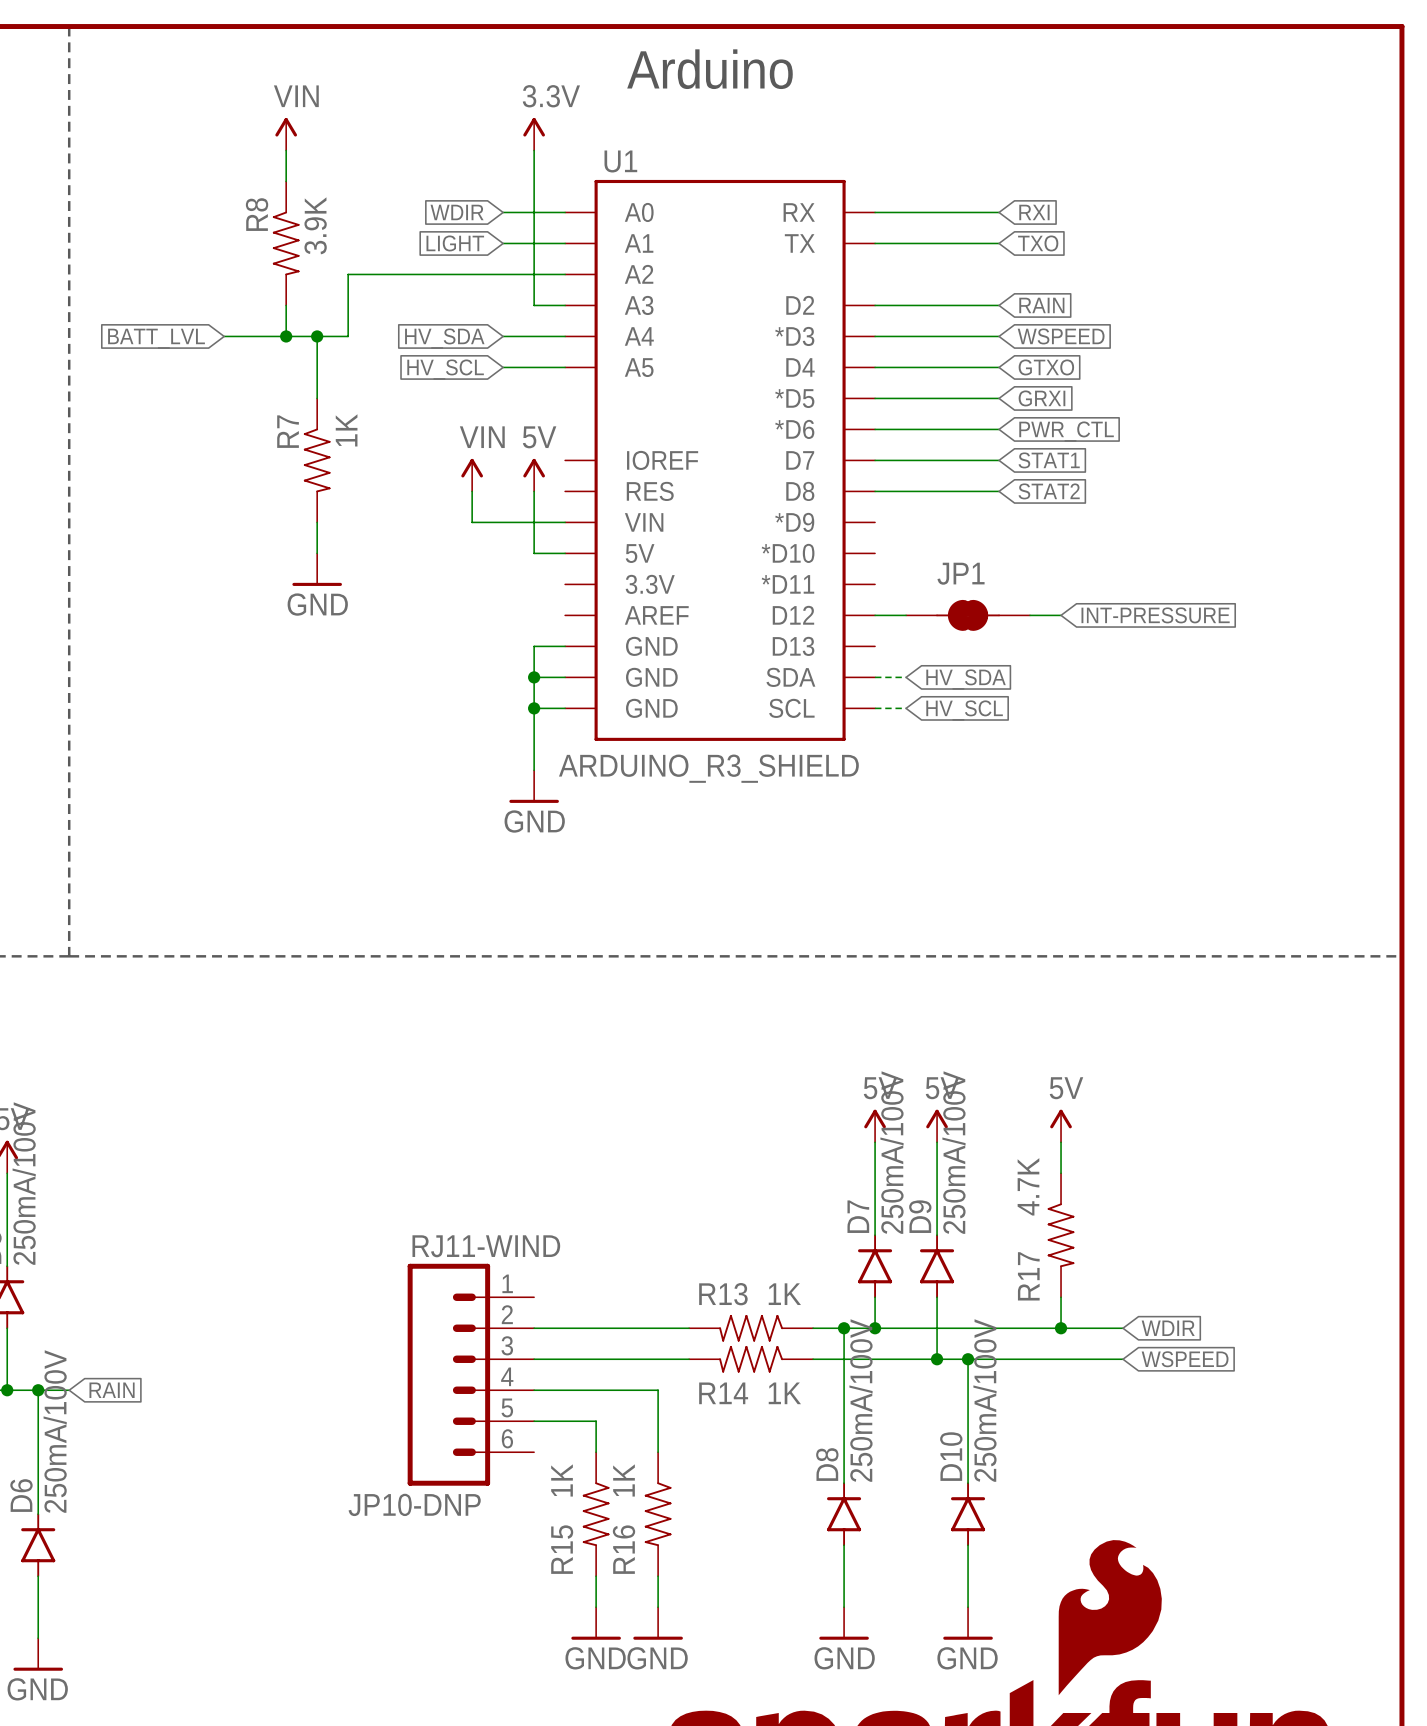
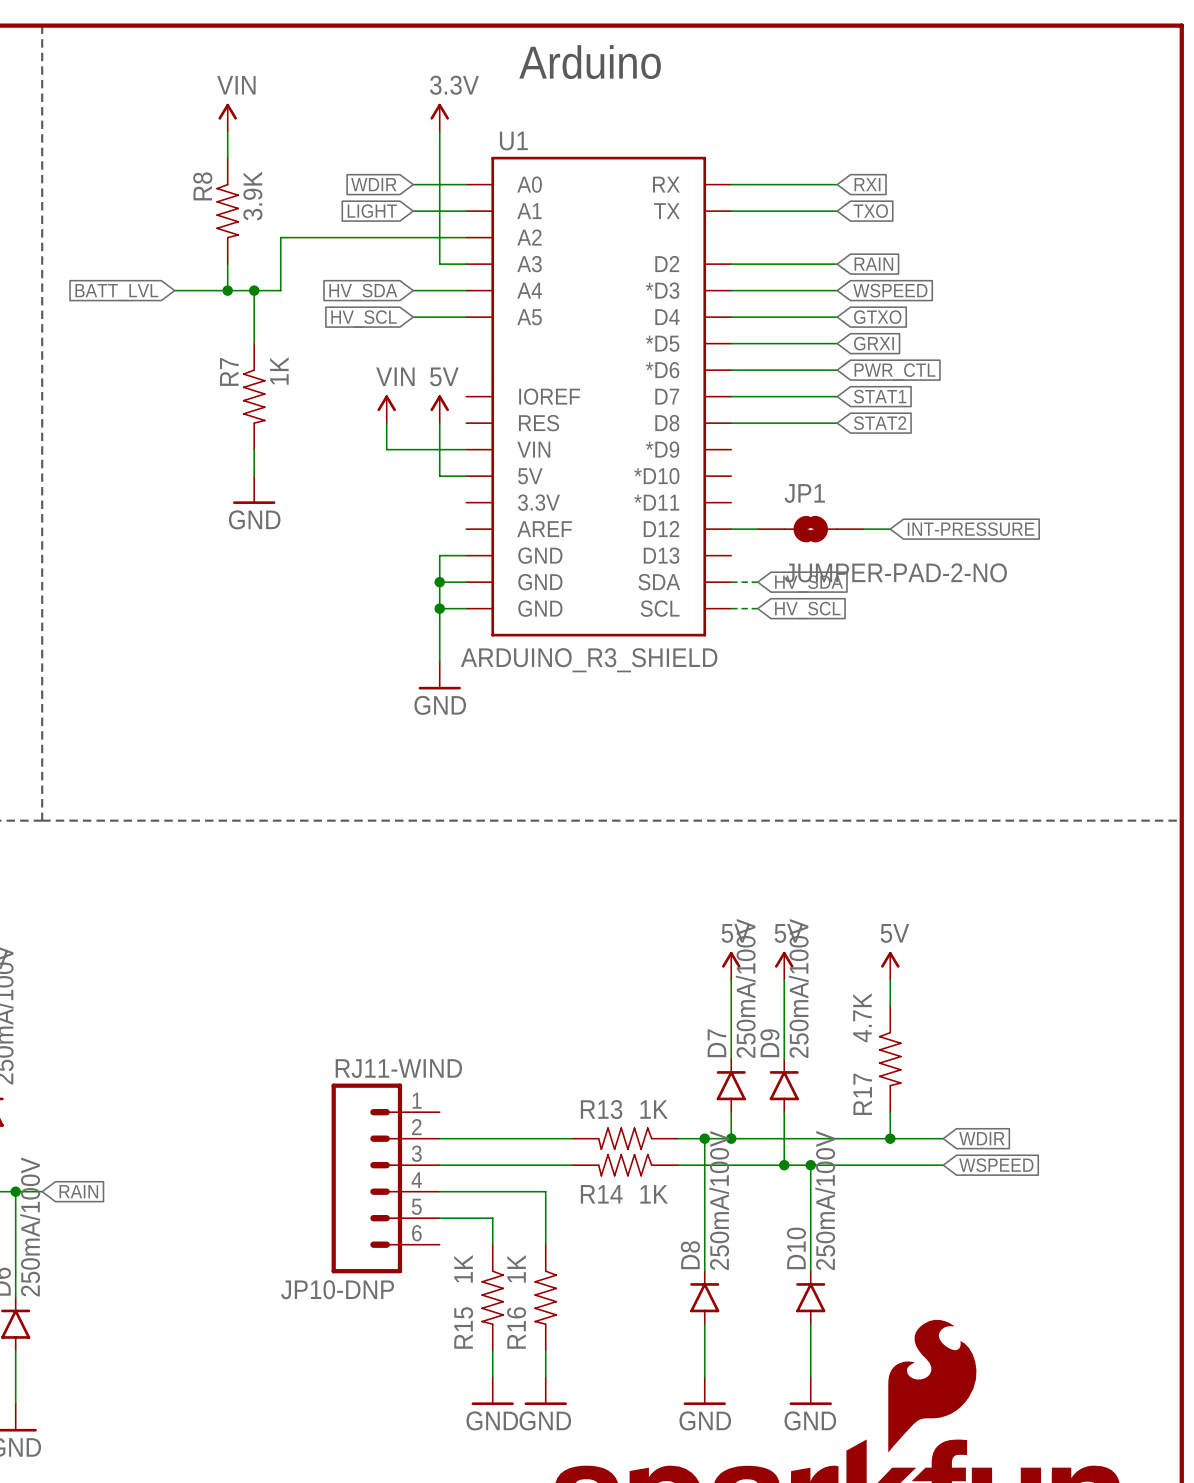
JP1 symbol: [906, 599, 1031, 631] -> [757, 515, 864, 543]
JP1 value: none -> JUMPER-PAD-2-NO (895, 572)

